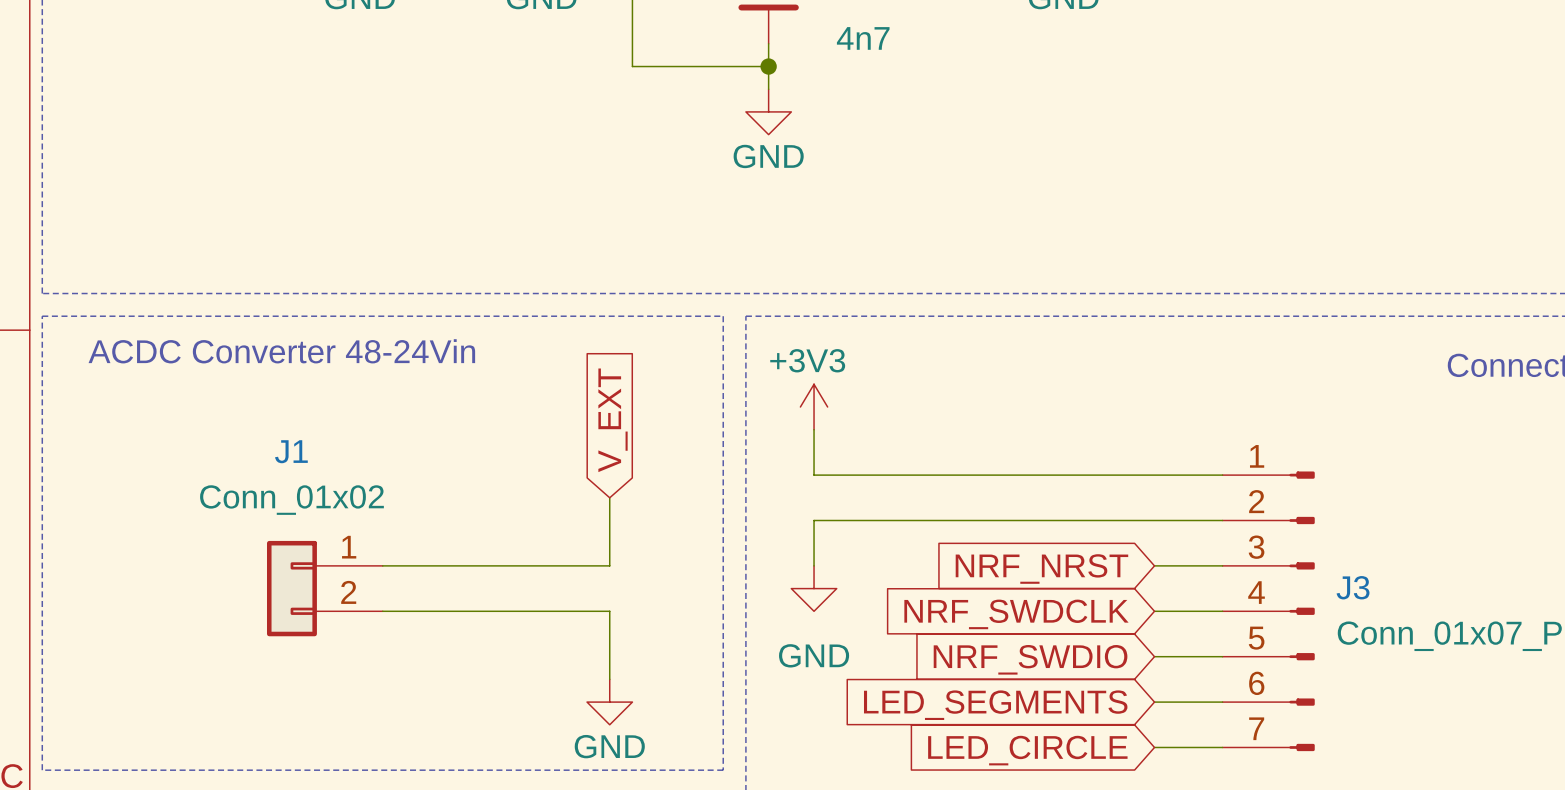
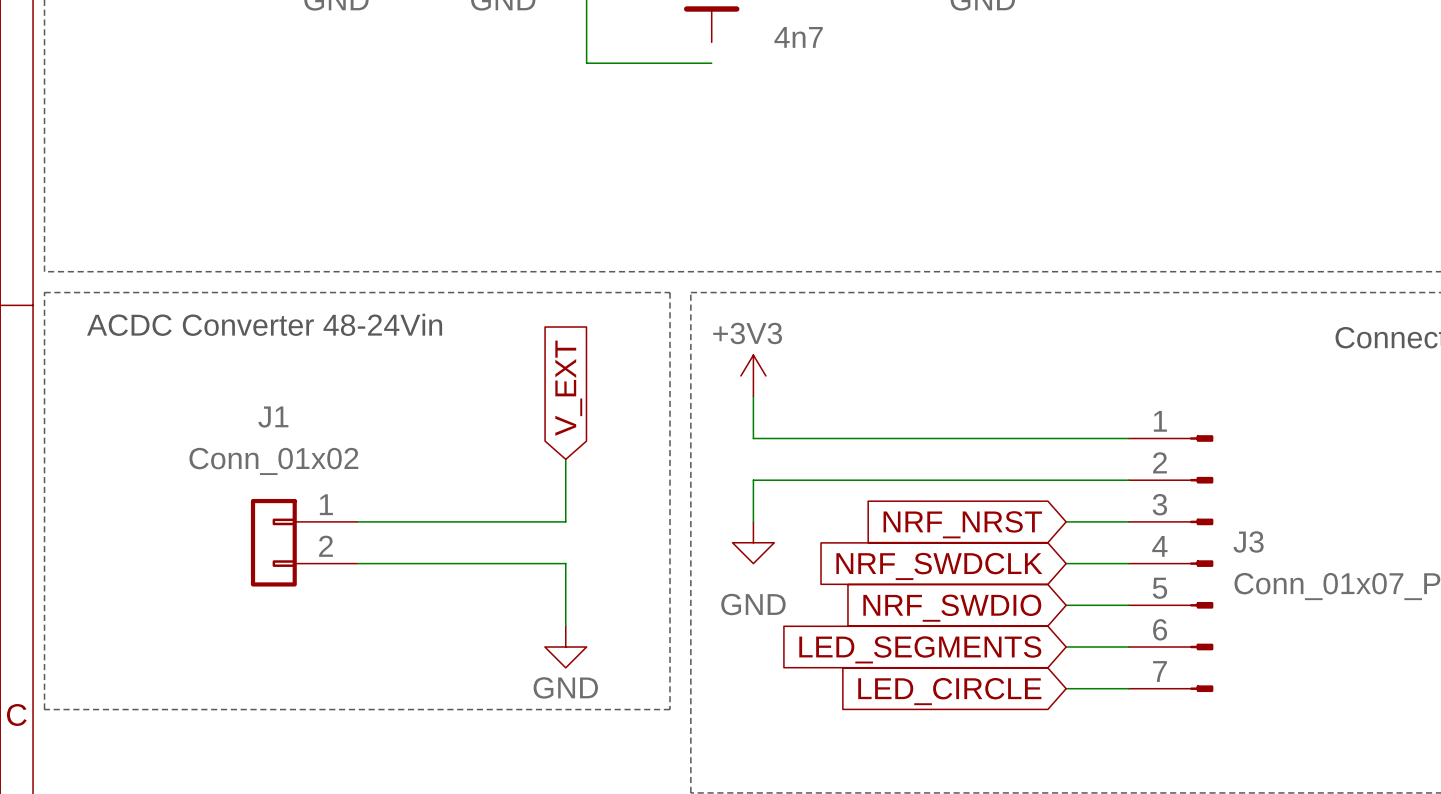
wire: (768, 43) (768, 89) -> none
junction: (768, 66) -> none
power symbol: GND (768, 111) -> none

